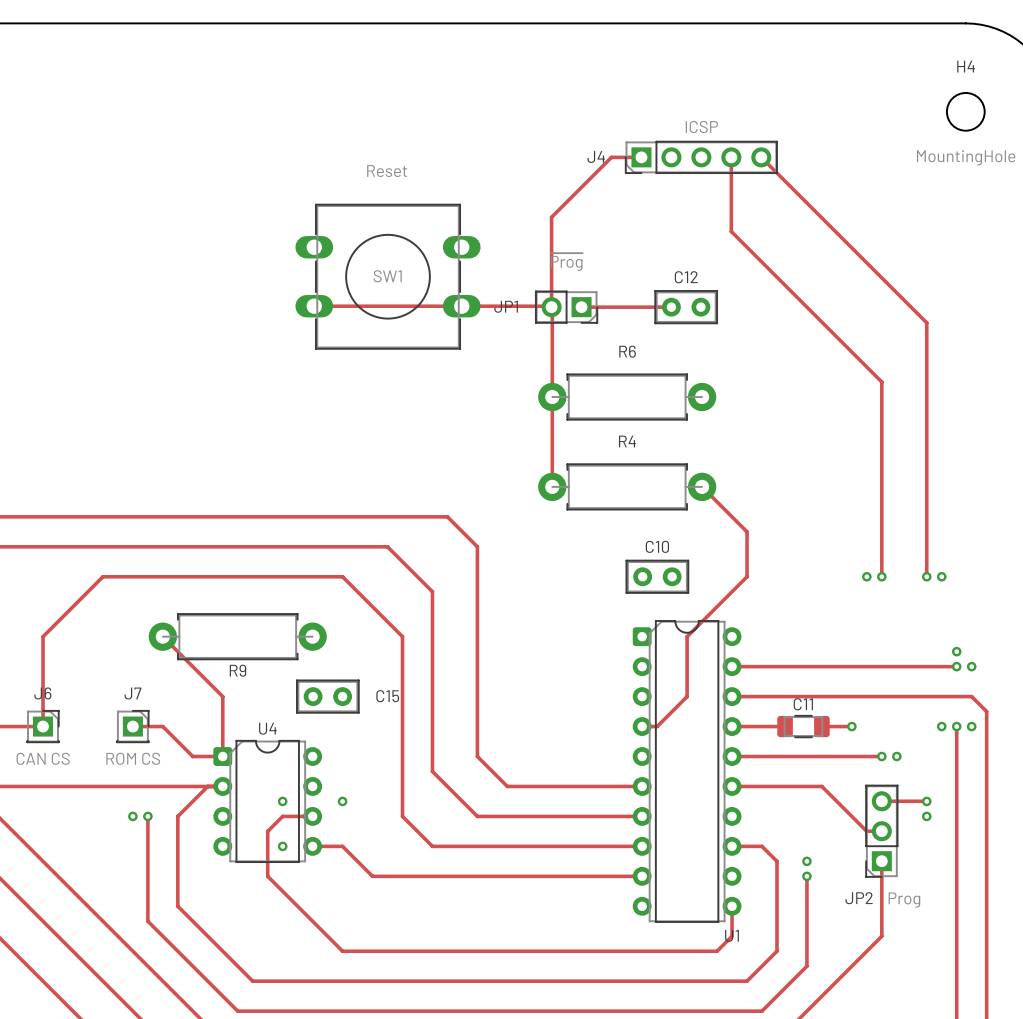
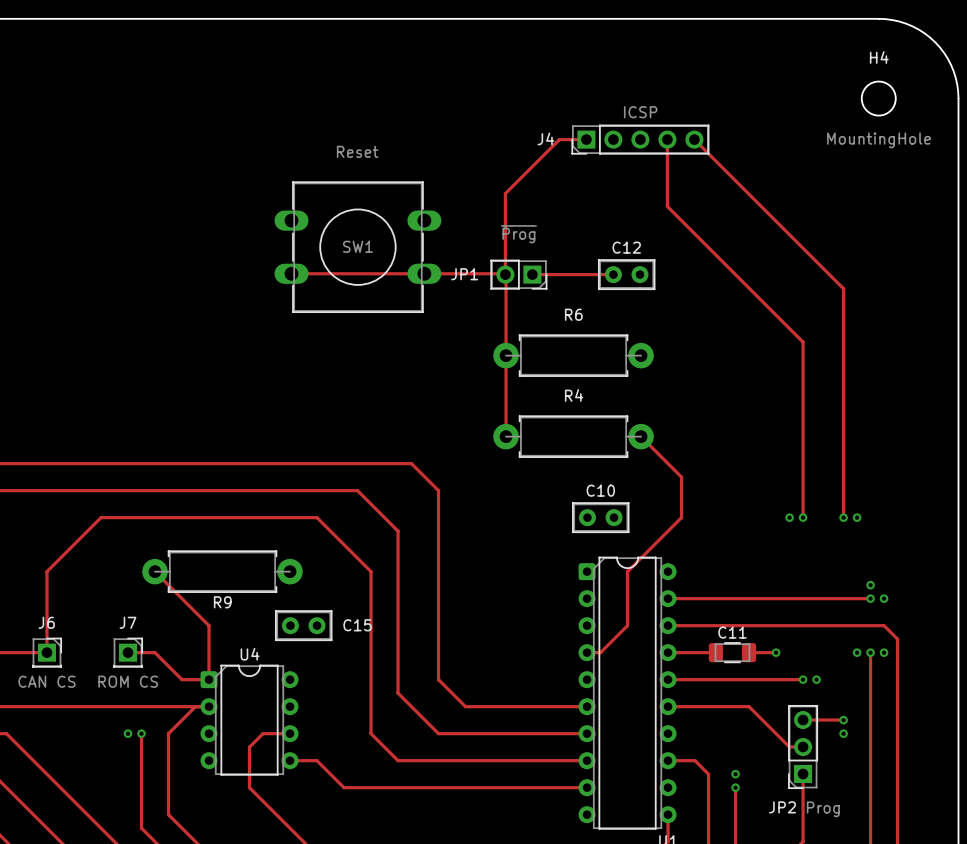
via: (282, 801) -> none
via: (342, 801) -> none
via: (282, 846) -> none

